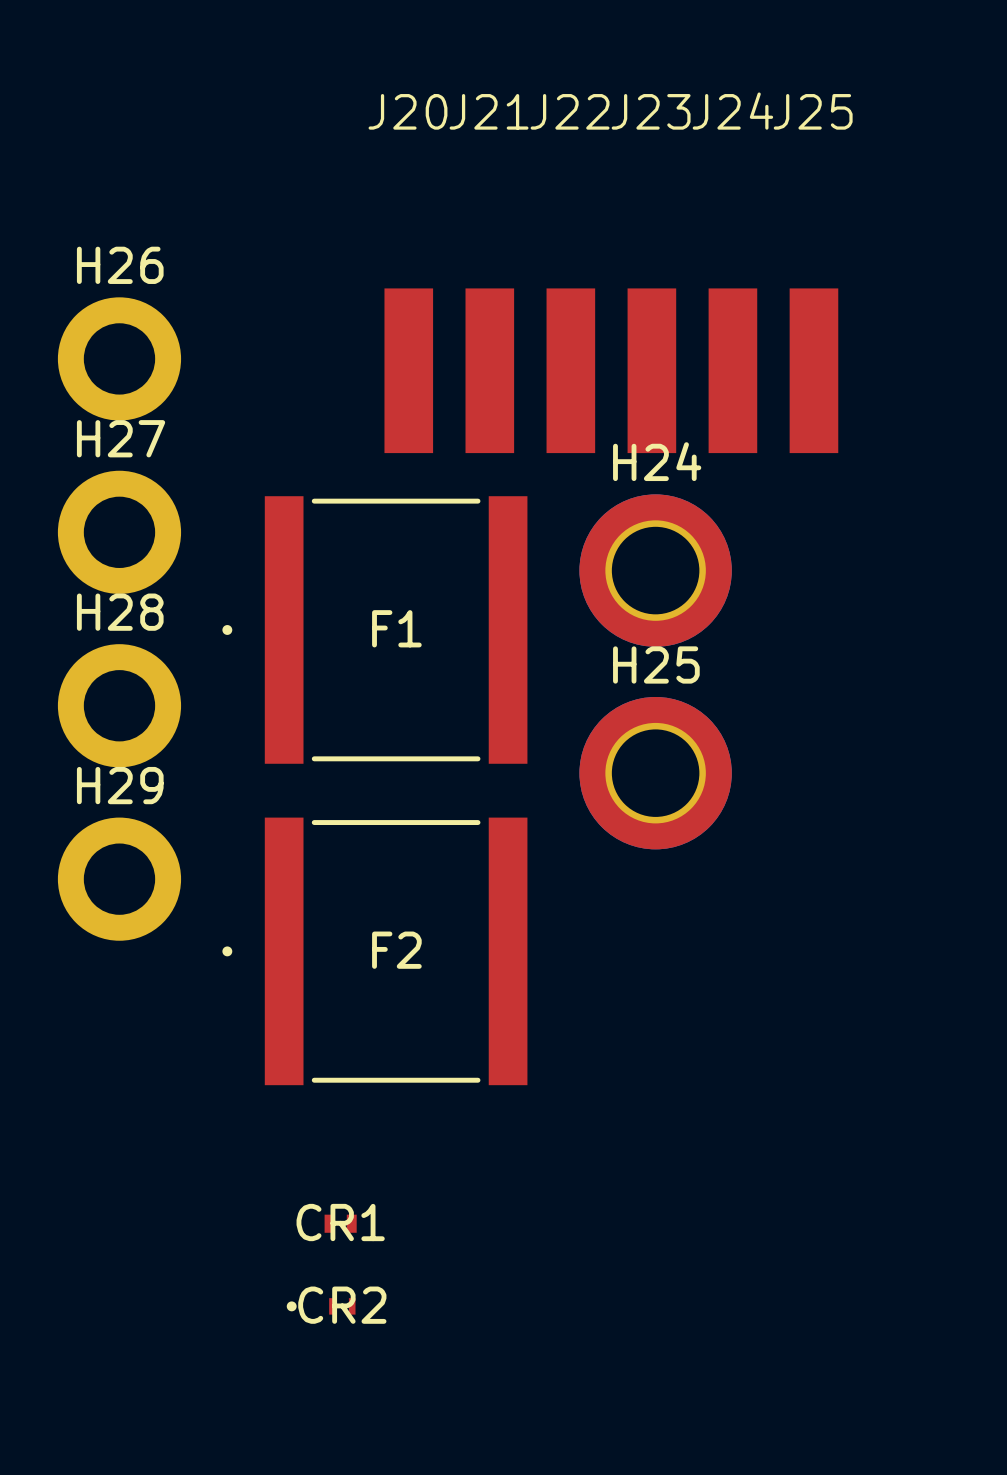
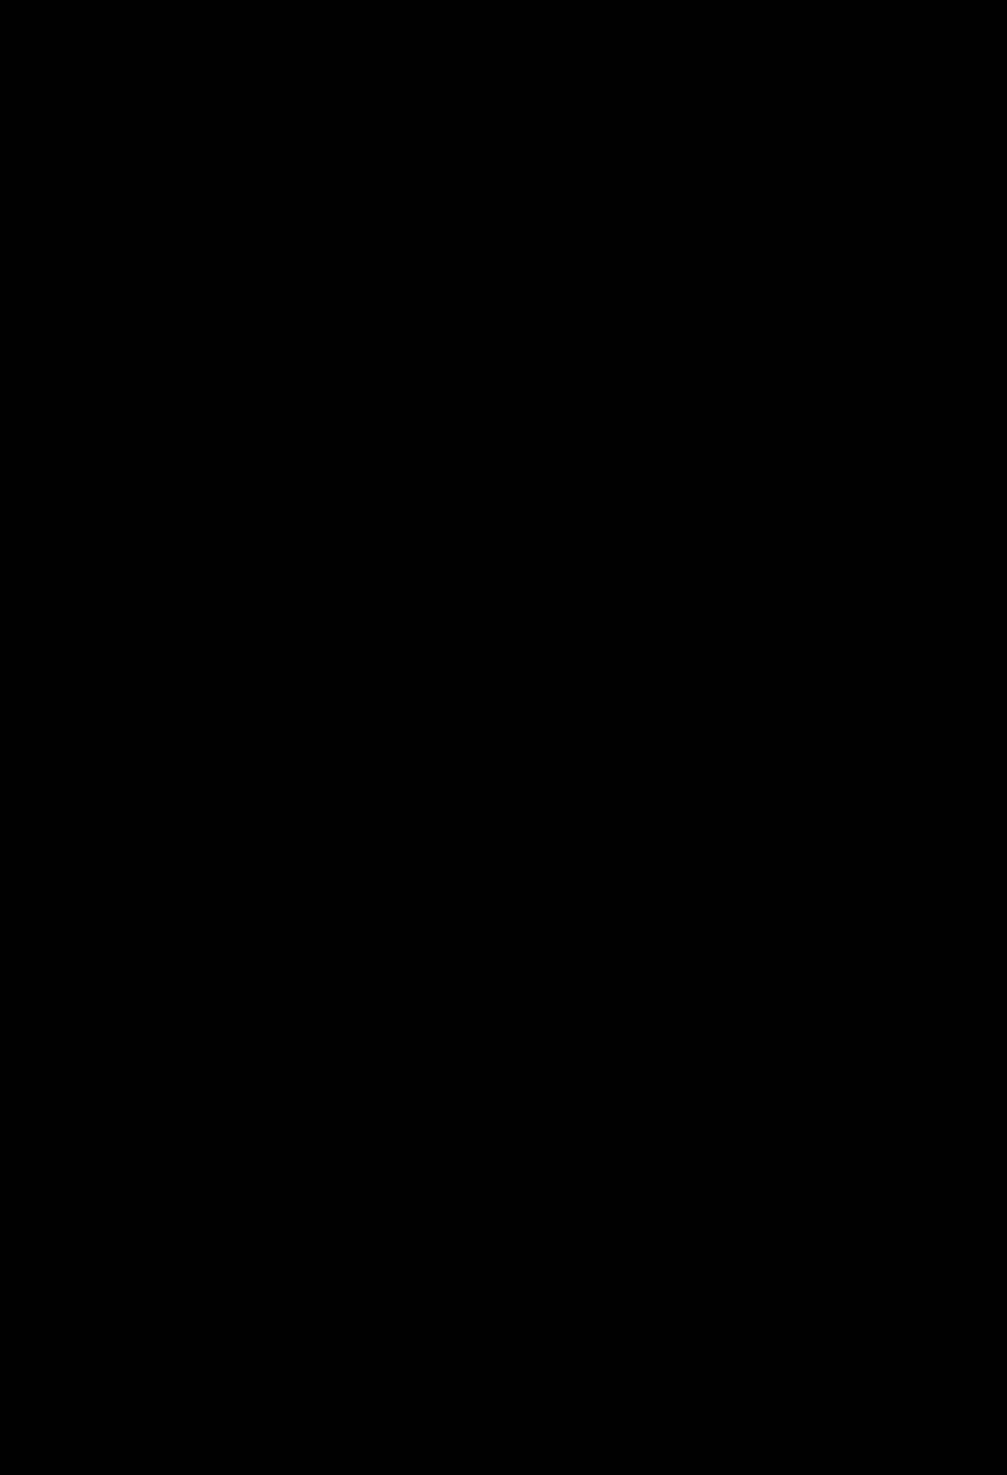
H26: (119, 358) -> none
J20: (408, 370) -> none
J21: (489, 370) -> none
J22: (570, 370) -> none
J23: (651, 370) -> none
J24: (732, 370) -> none
J25: (813, 370) -> none
H27: (119, 532) -> none
H24: (655, 570) -> none
F1: (374, 629) -> none
H28: (119, 705) -> none
H25: (655, 773) -> none
H29: (119, 879) -> none
F2: (374, 951) -> none
CR1: (340, 1223) -> none
CR2: (321, 1306) -> none

